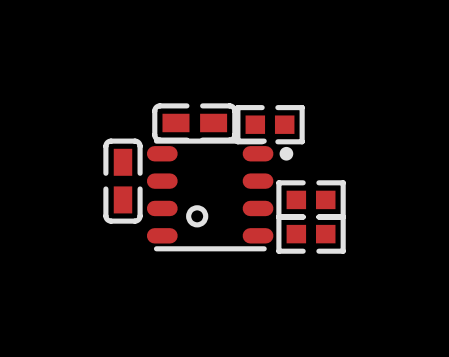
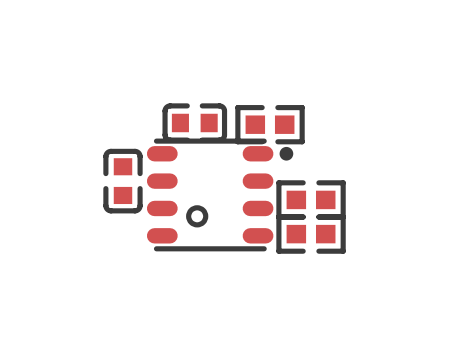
part footprint: [152, 103, 238, 143] -> [162, 103, 228, 143]
part footprint: [103, 138, 143, 224] -> [103, 148, 143, 214]

